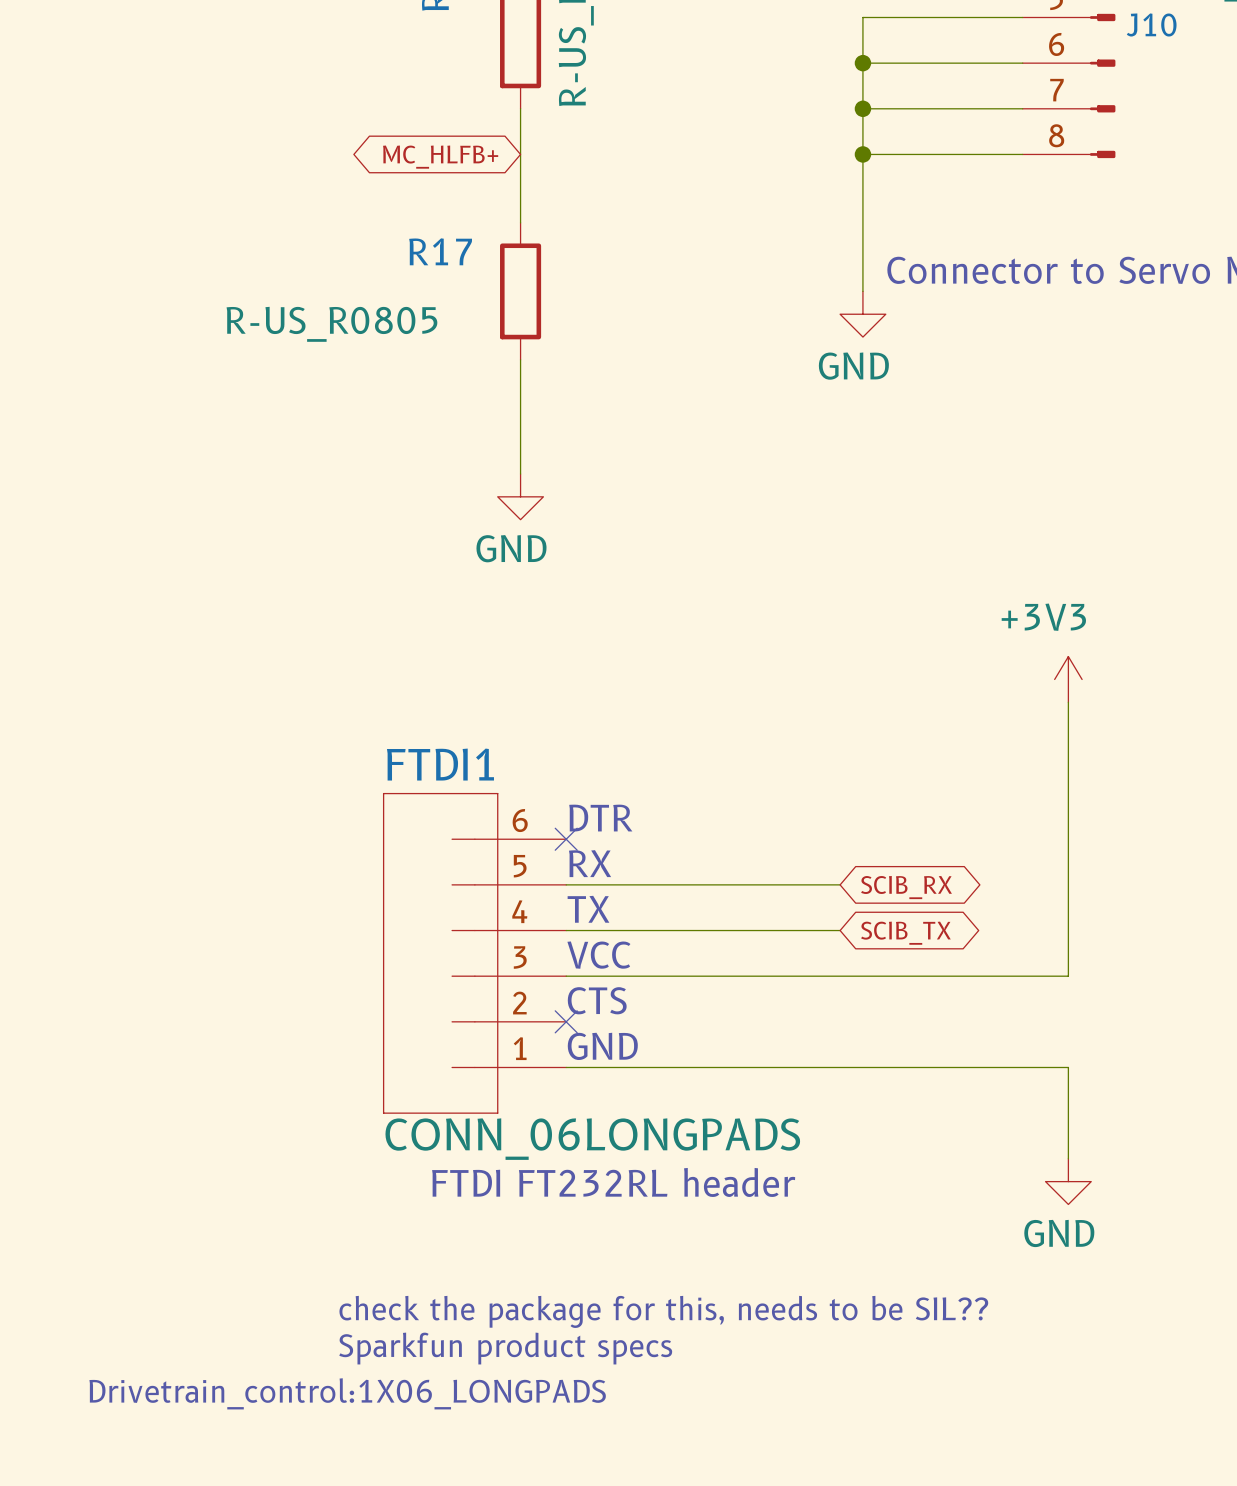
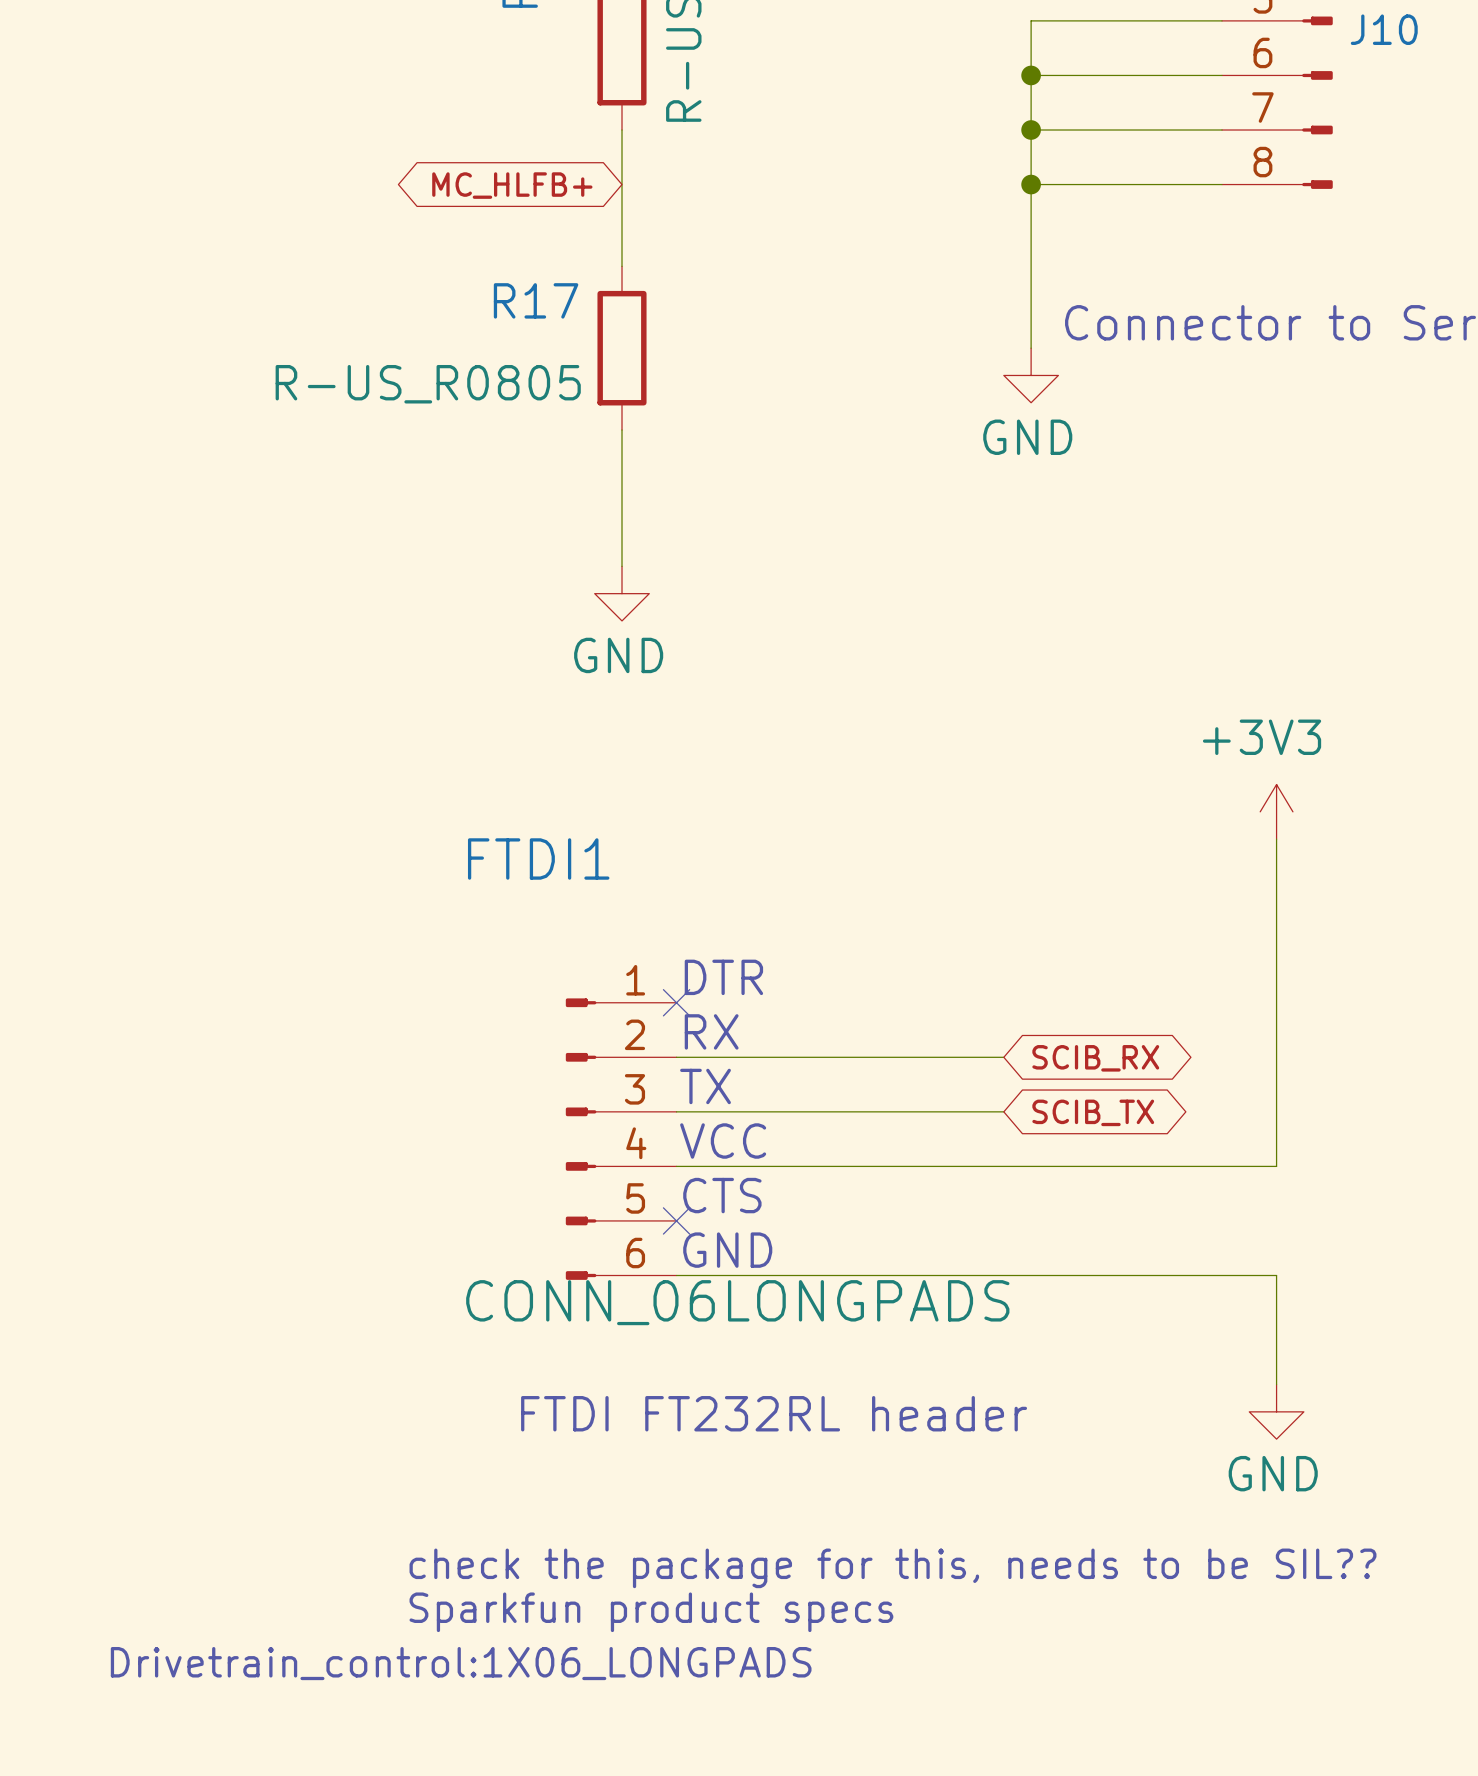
FTDI1 name position: FTDI1 (440, 764) -> FTDI1 (538, 858)
FTDI1 symbol: [383, 793, 567, 1114] -> [565, 998, 677, 1280]
FTDI1 value position: CONN_06LONGPADS (592, 1139) -> CONN_06LONGPADS (737, 1302)

